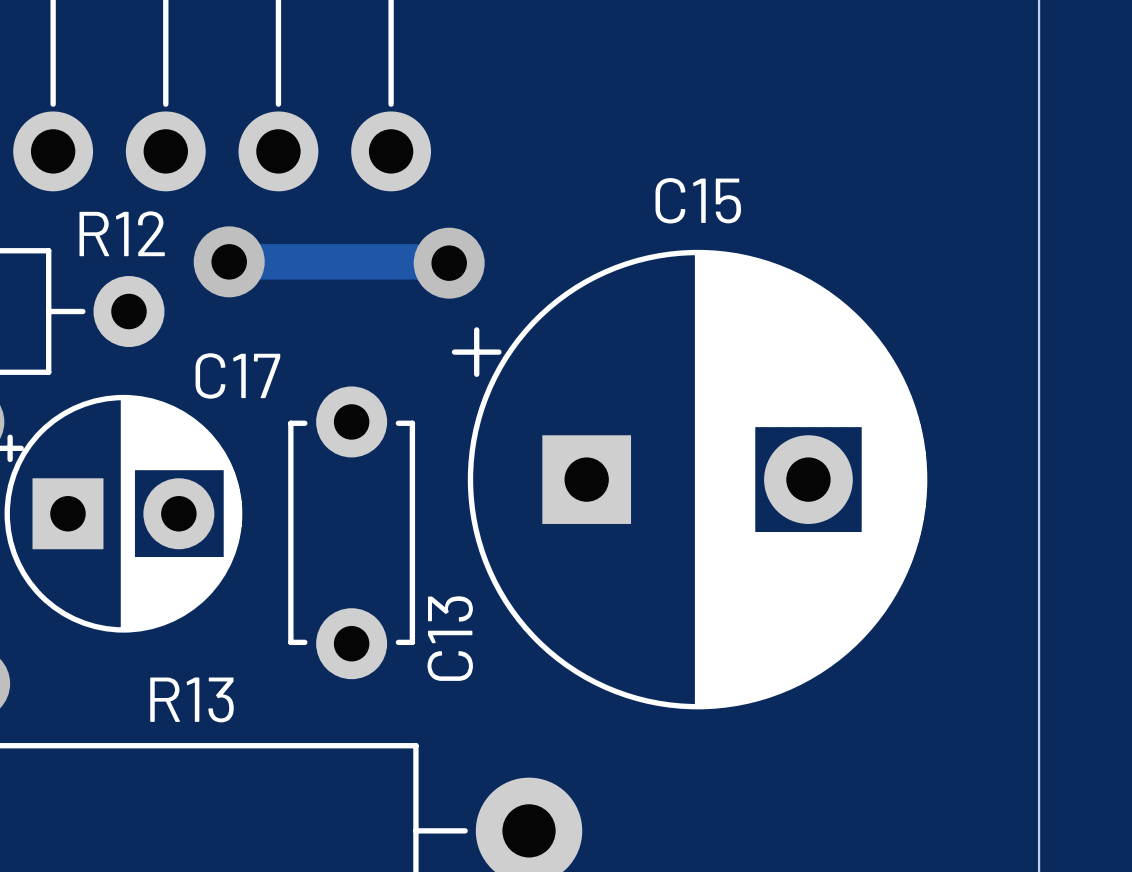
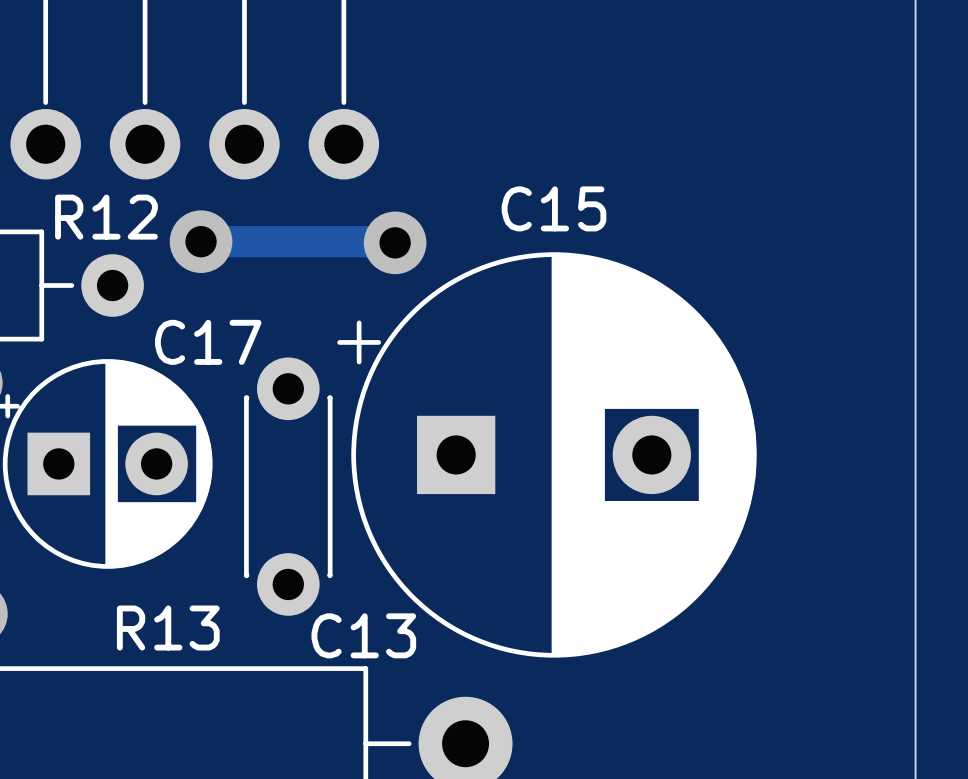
C13 footprint: [288, 386, 416, 680] -> [244, 357, 333, 616]
C15 position: (689, 479) -> (546, 454)
C13 name rotation: 0° (450, 638) -> 90° clockwise (363, 635)

